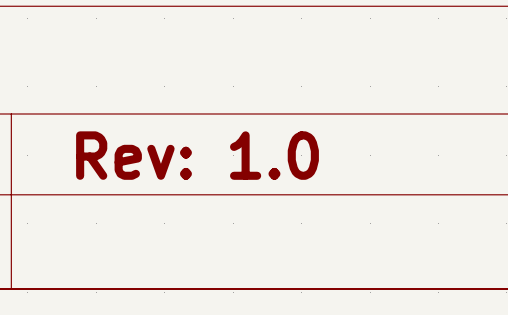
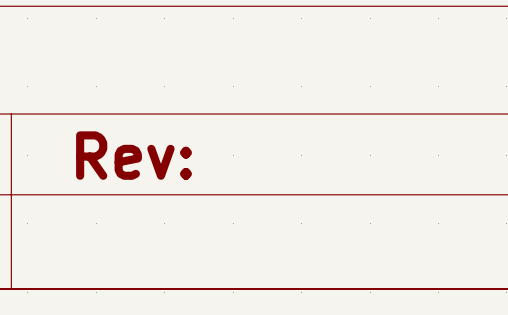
title block: Rev: 1.0 (197, 155) -> Rev: (134, 155)

